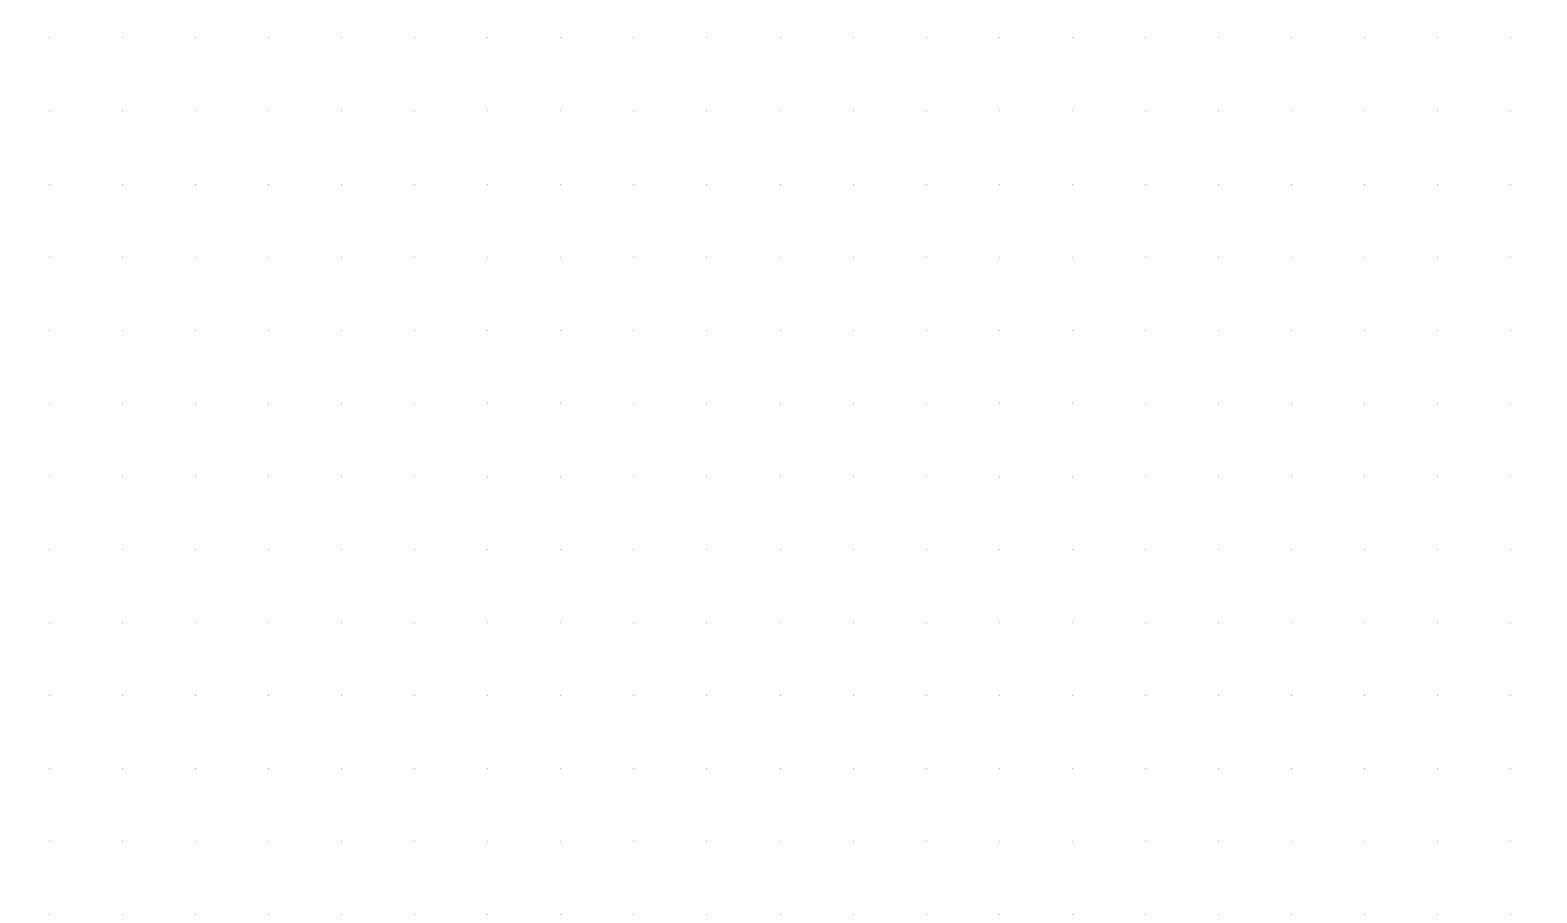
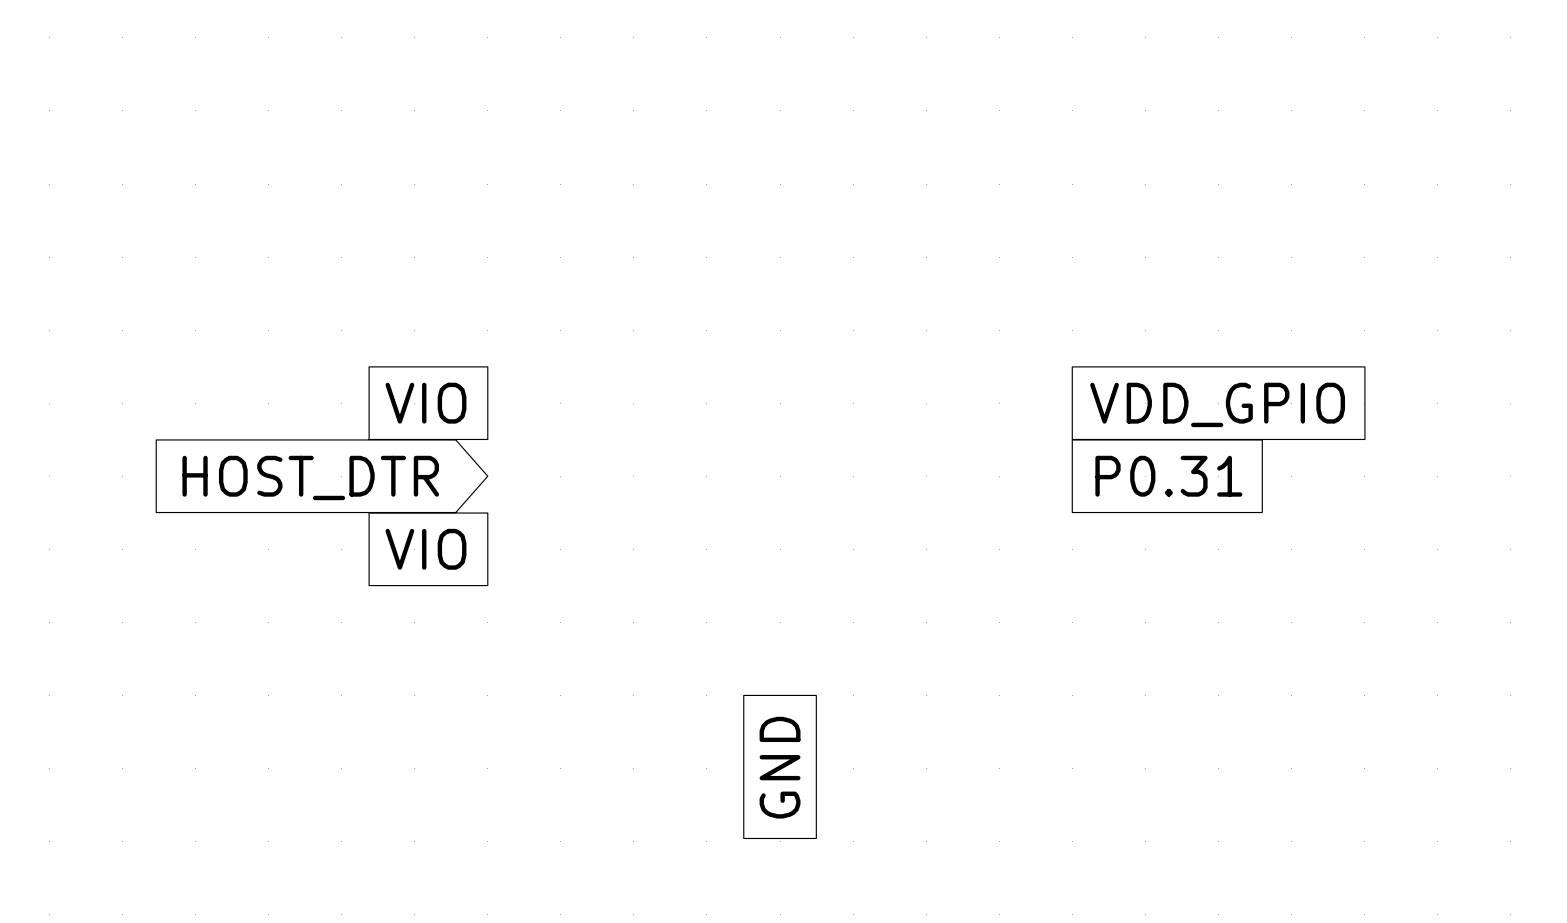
global label: none -> VIO (425, 403)
global label: none -> VDD_GPIO (1217, 404)
global label: none -> P0.31 (1168, 476)
global label: none -> HOST_DTR (310, 477)
global label: none -> VIO (425, 549)
global label: none -> GND (780, 767)

